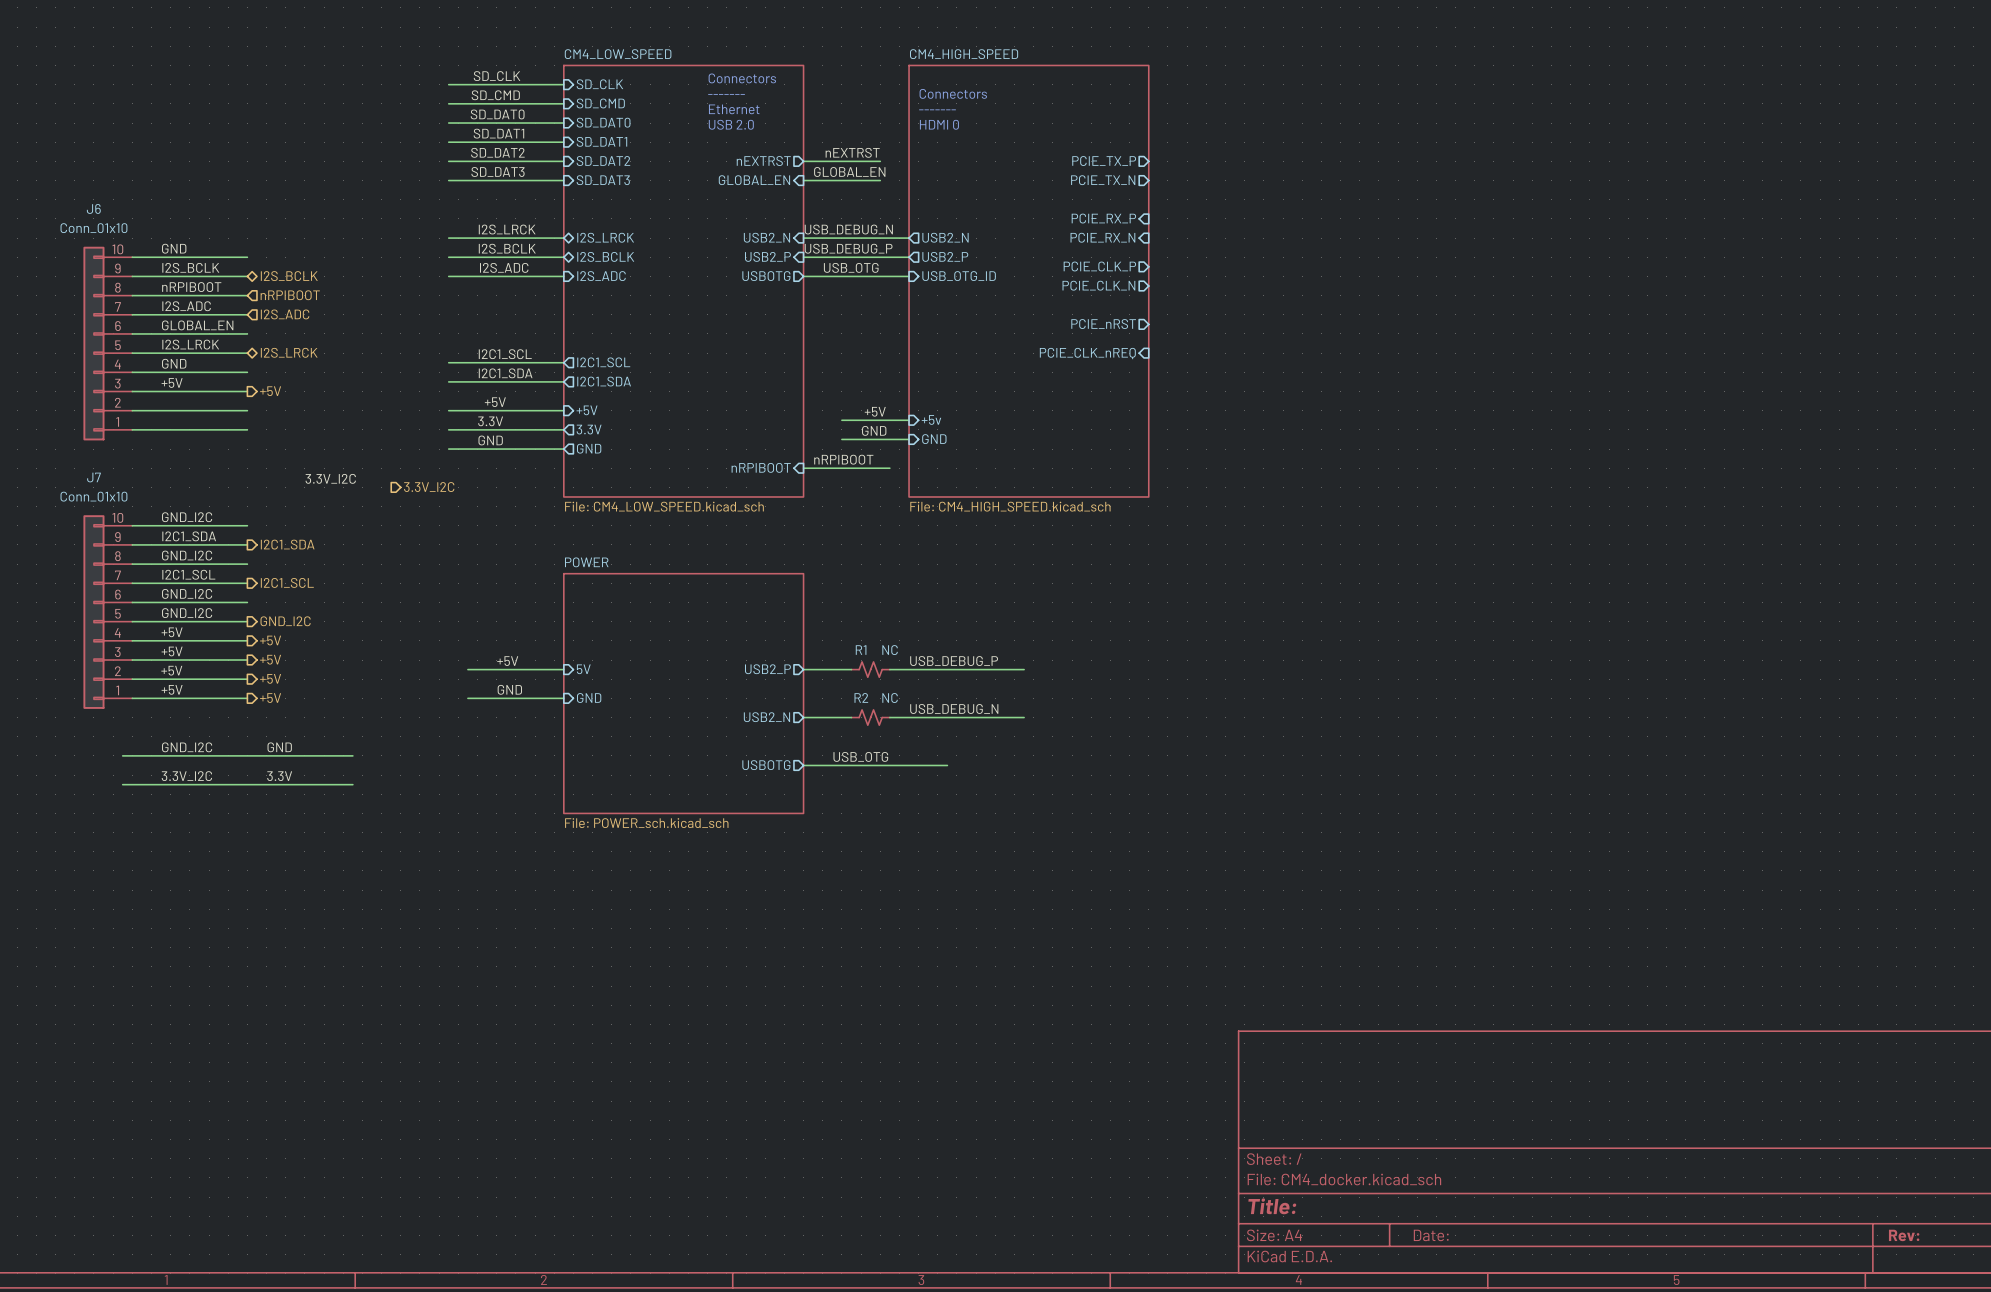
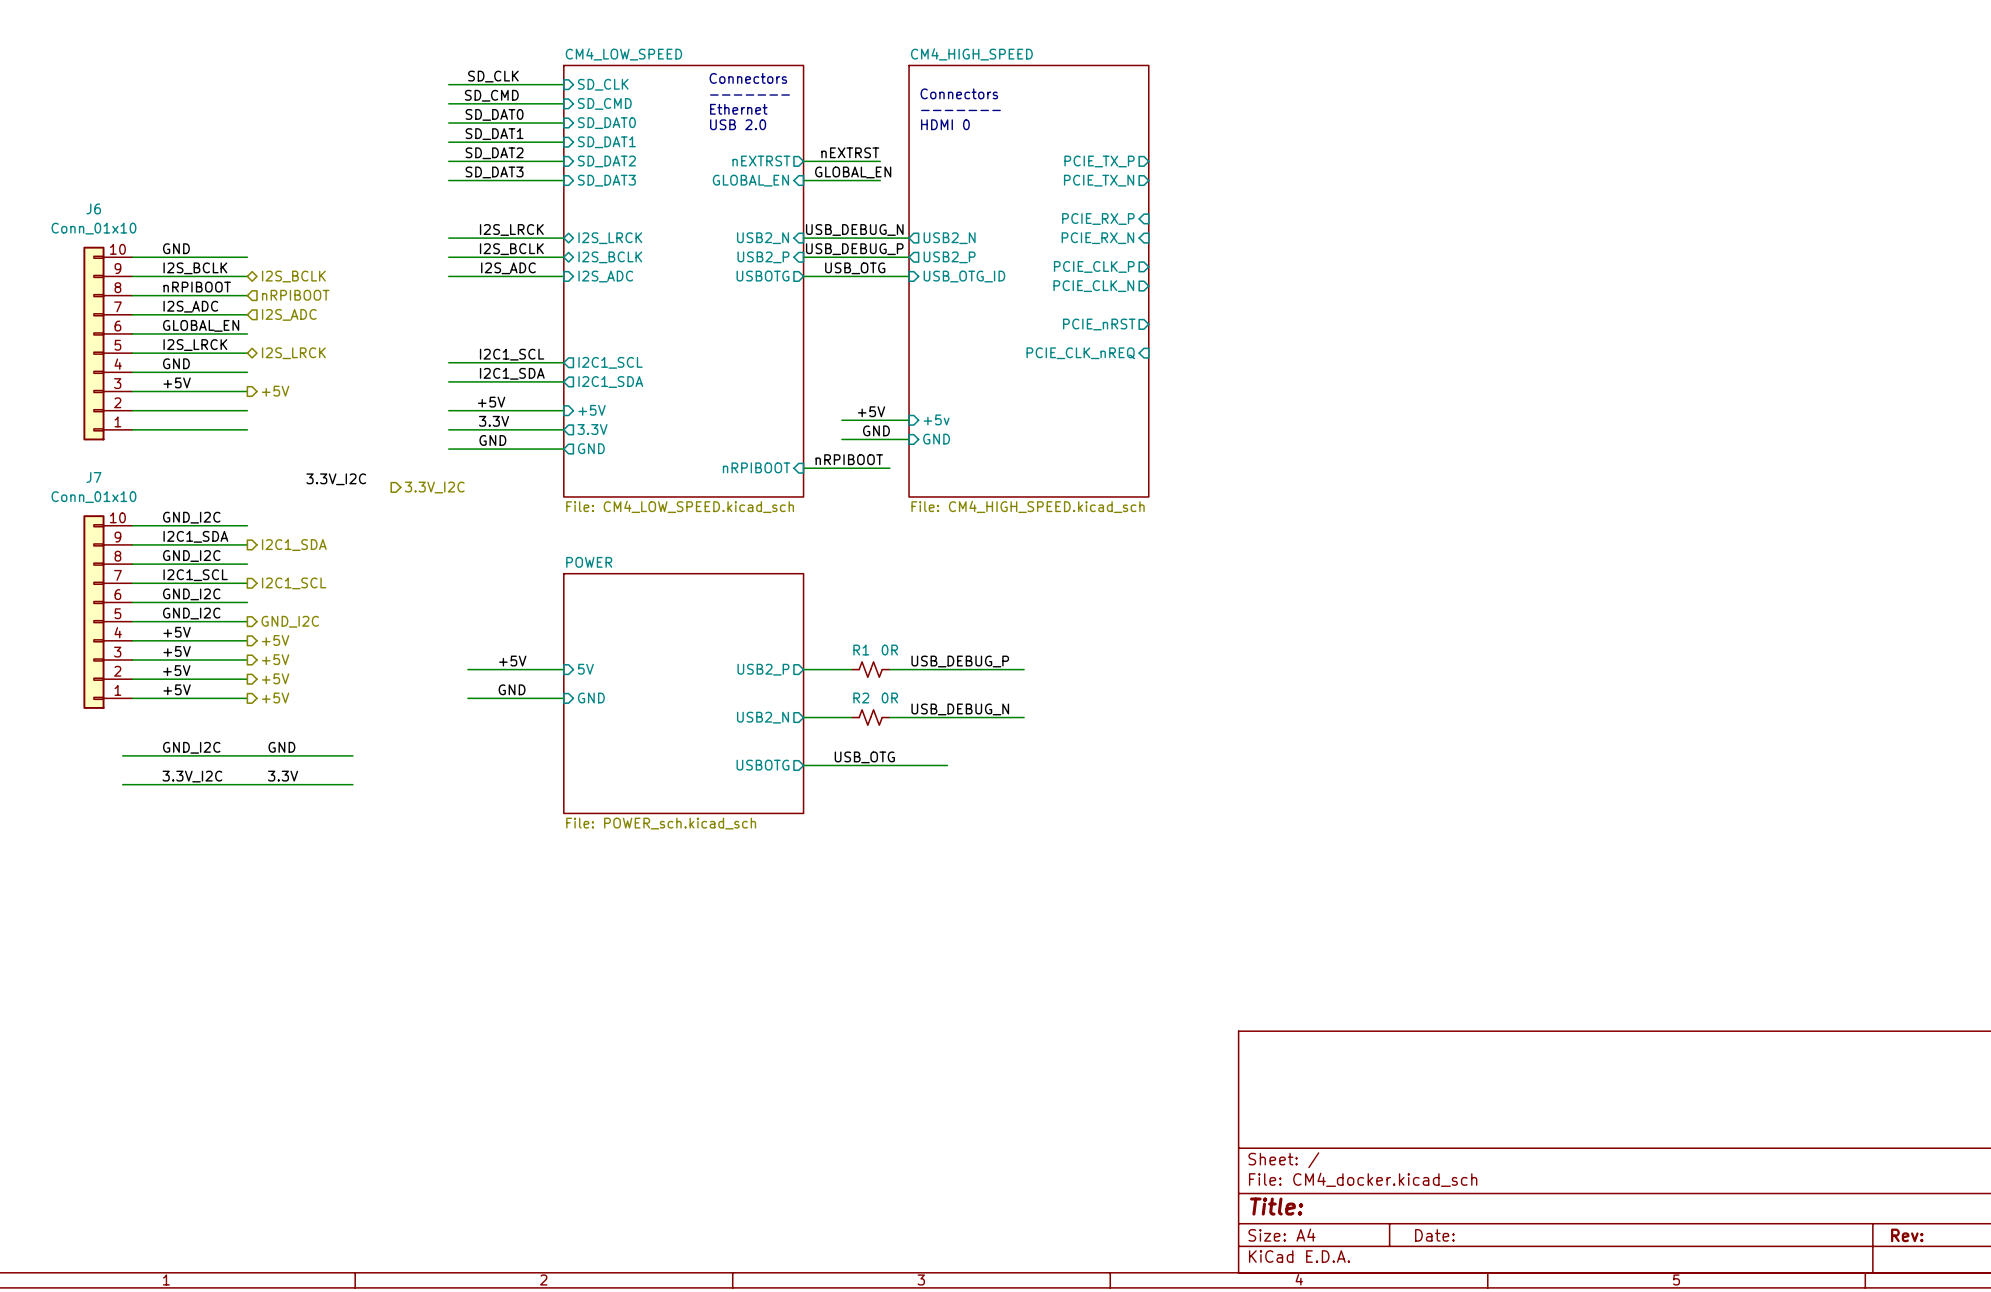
R1 value: NC (890, 650) -> 0R (889, 650)
R2 value: NC (890, 698) -> 0R (889, 698)

